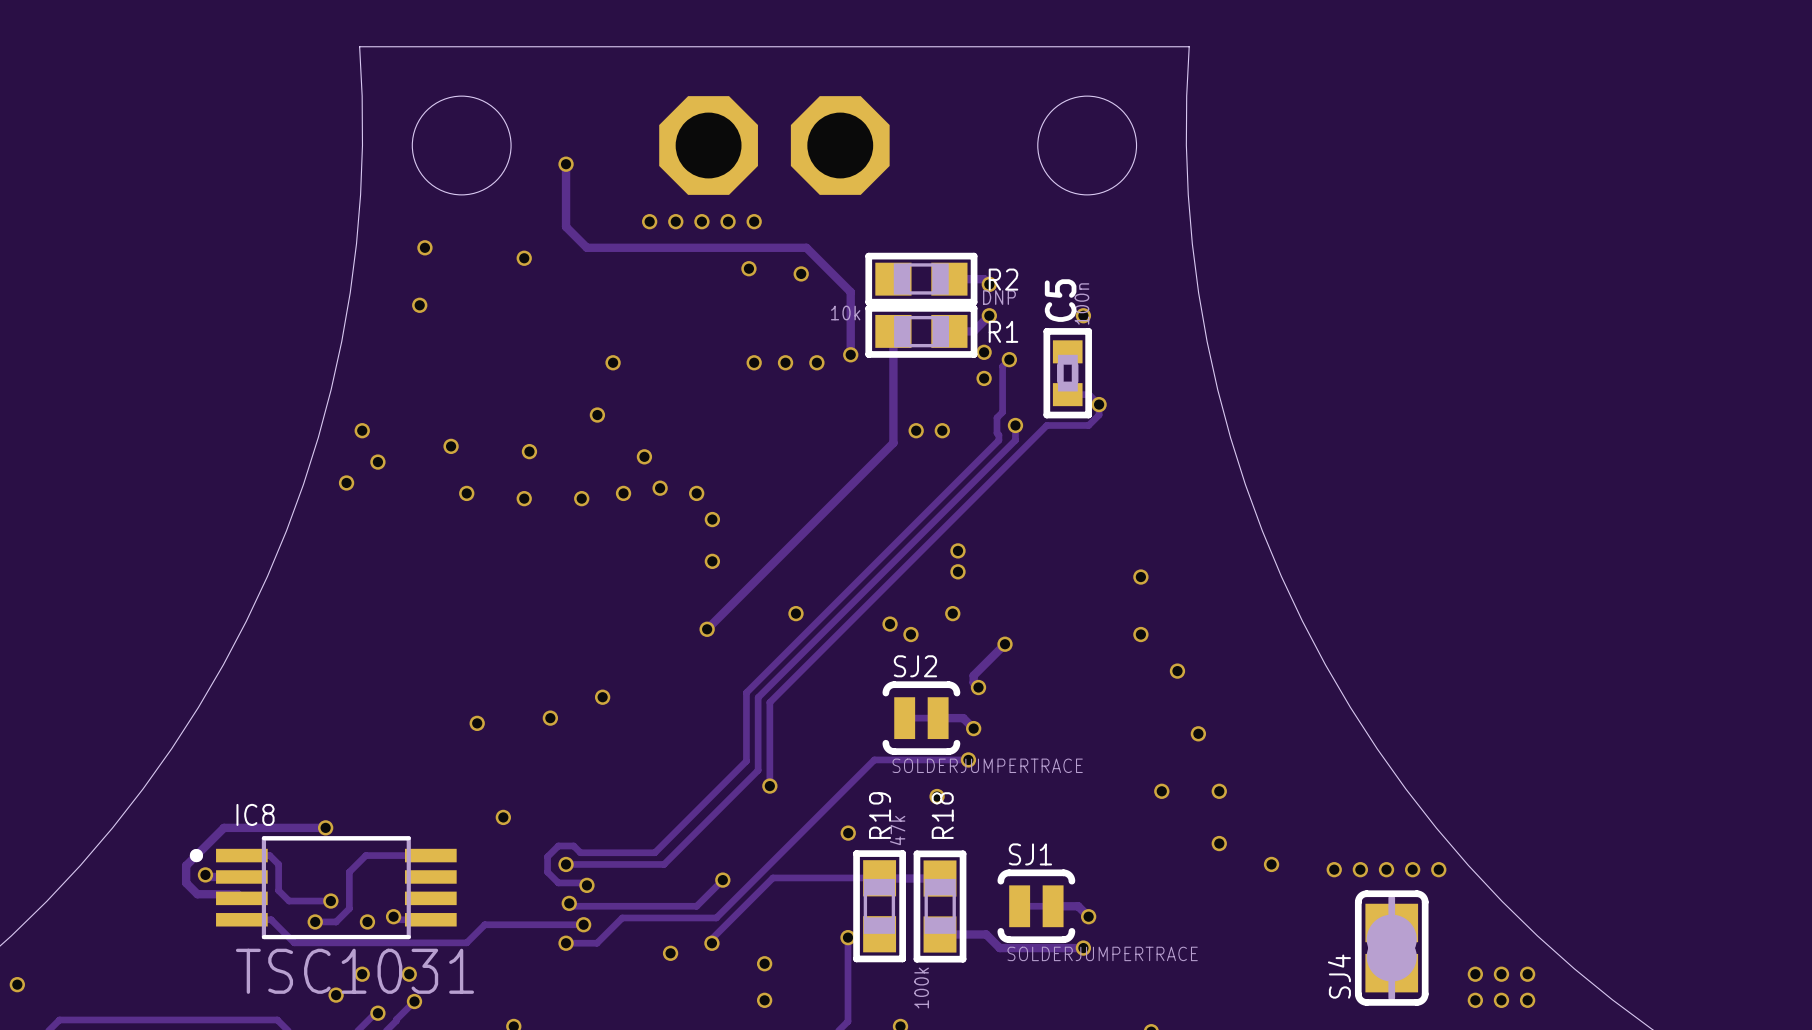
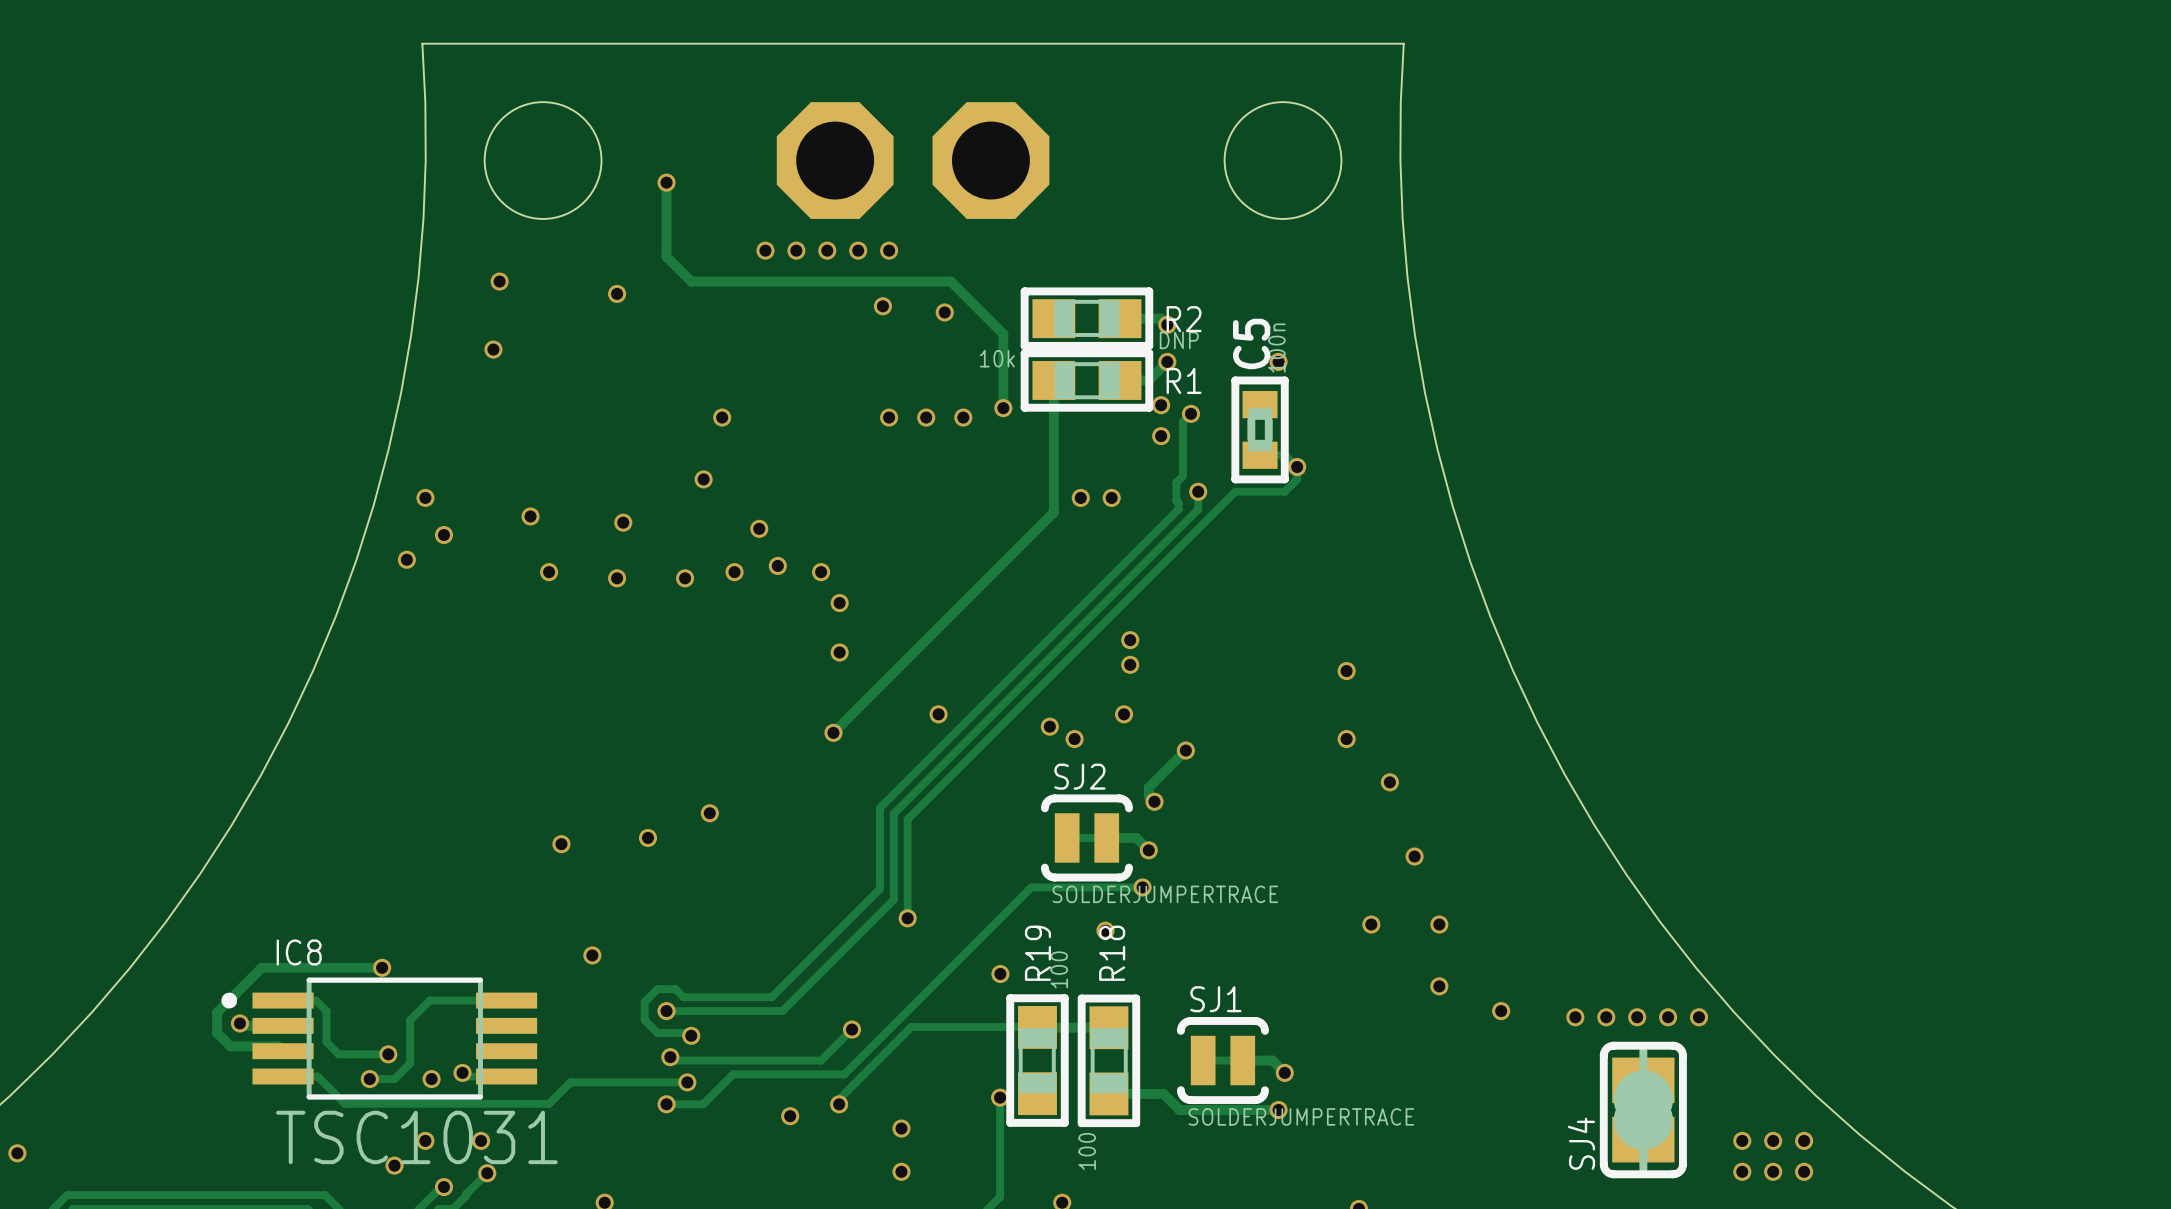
R19 value: 47k (897, 830) -> 100 (1059, 969)
R18 value: 100k (921, 987) -> 100 (1087, 1151)

